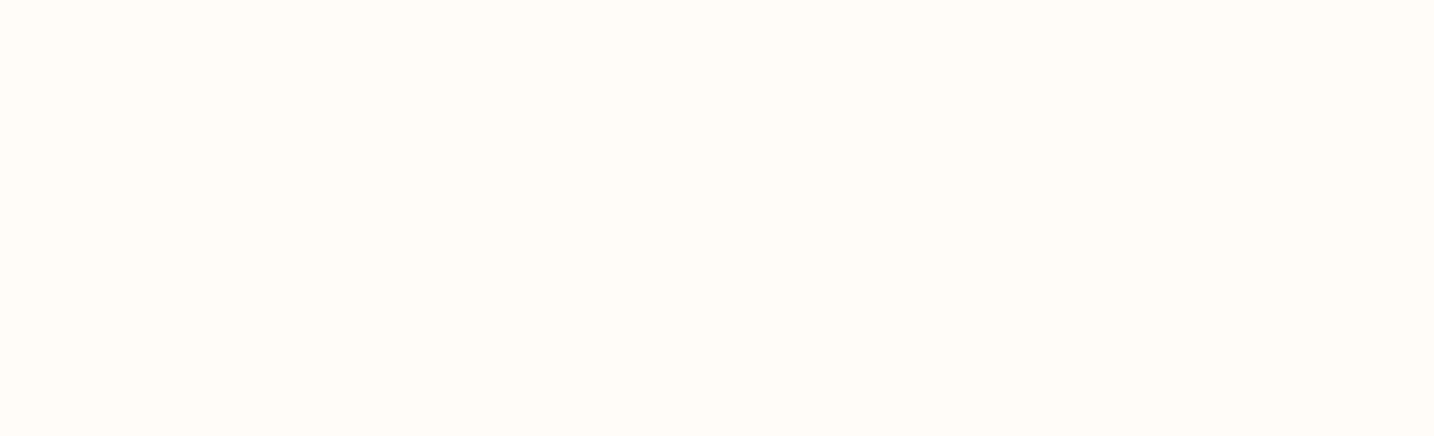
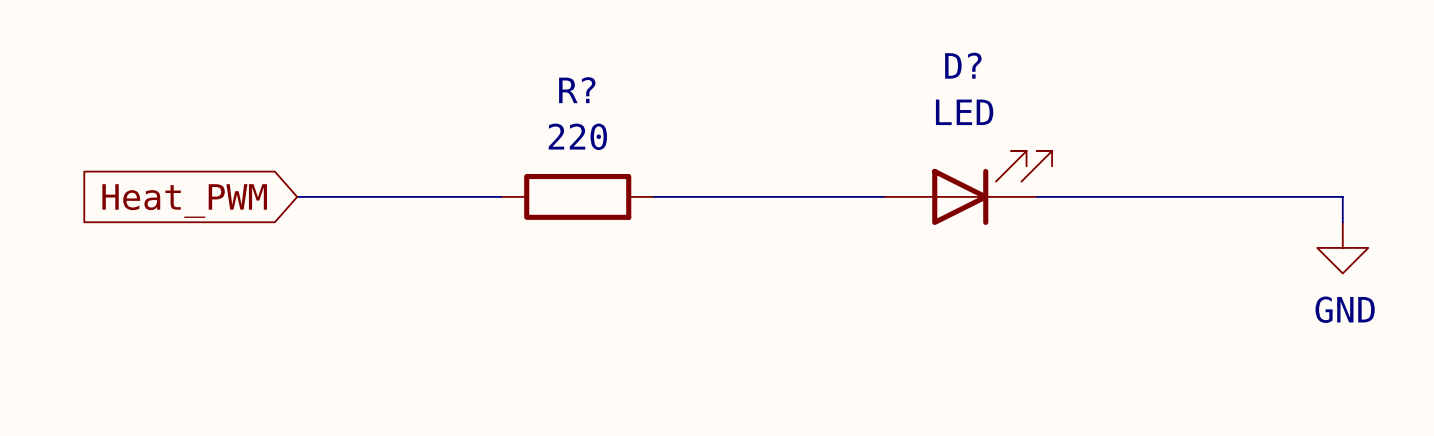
D?: none -> LED (967, 188)
wire: none -> (297, 196) (501, 196)
R?: none -> 220 (577, 196)
wire: none -> (654, 196) (883, 196)
wire: none -> (1036, 196) (1342, 196) (1342, 222)
global label: none -> Heat_PWM (184, 201)
power symbol: none -> GND (1342, 247)

